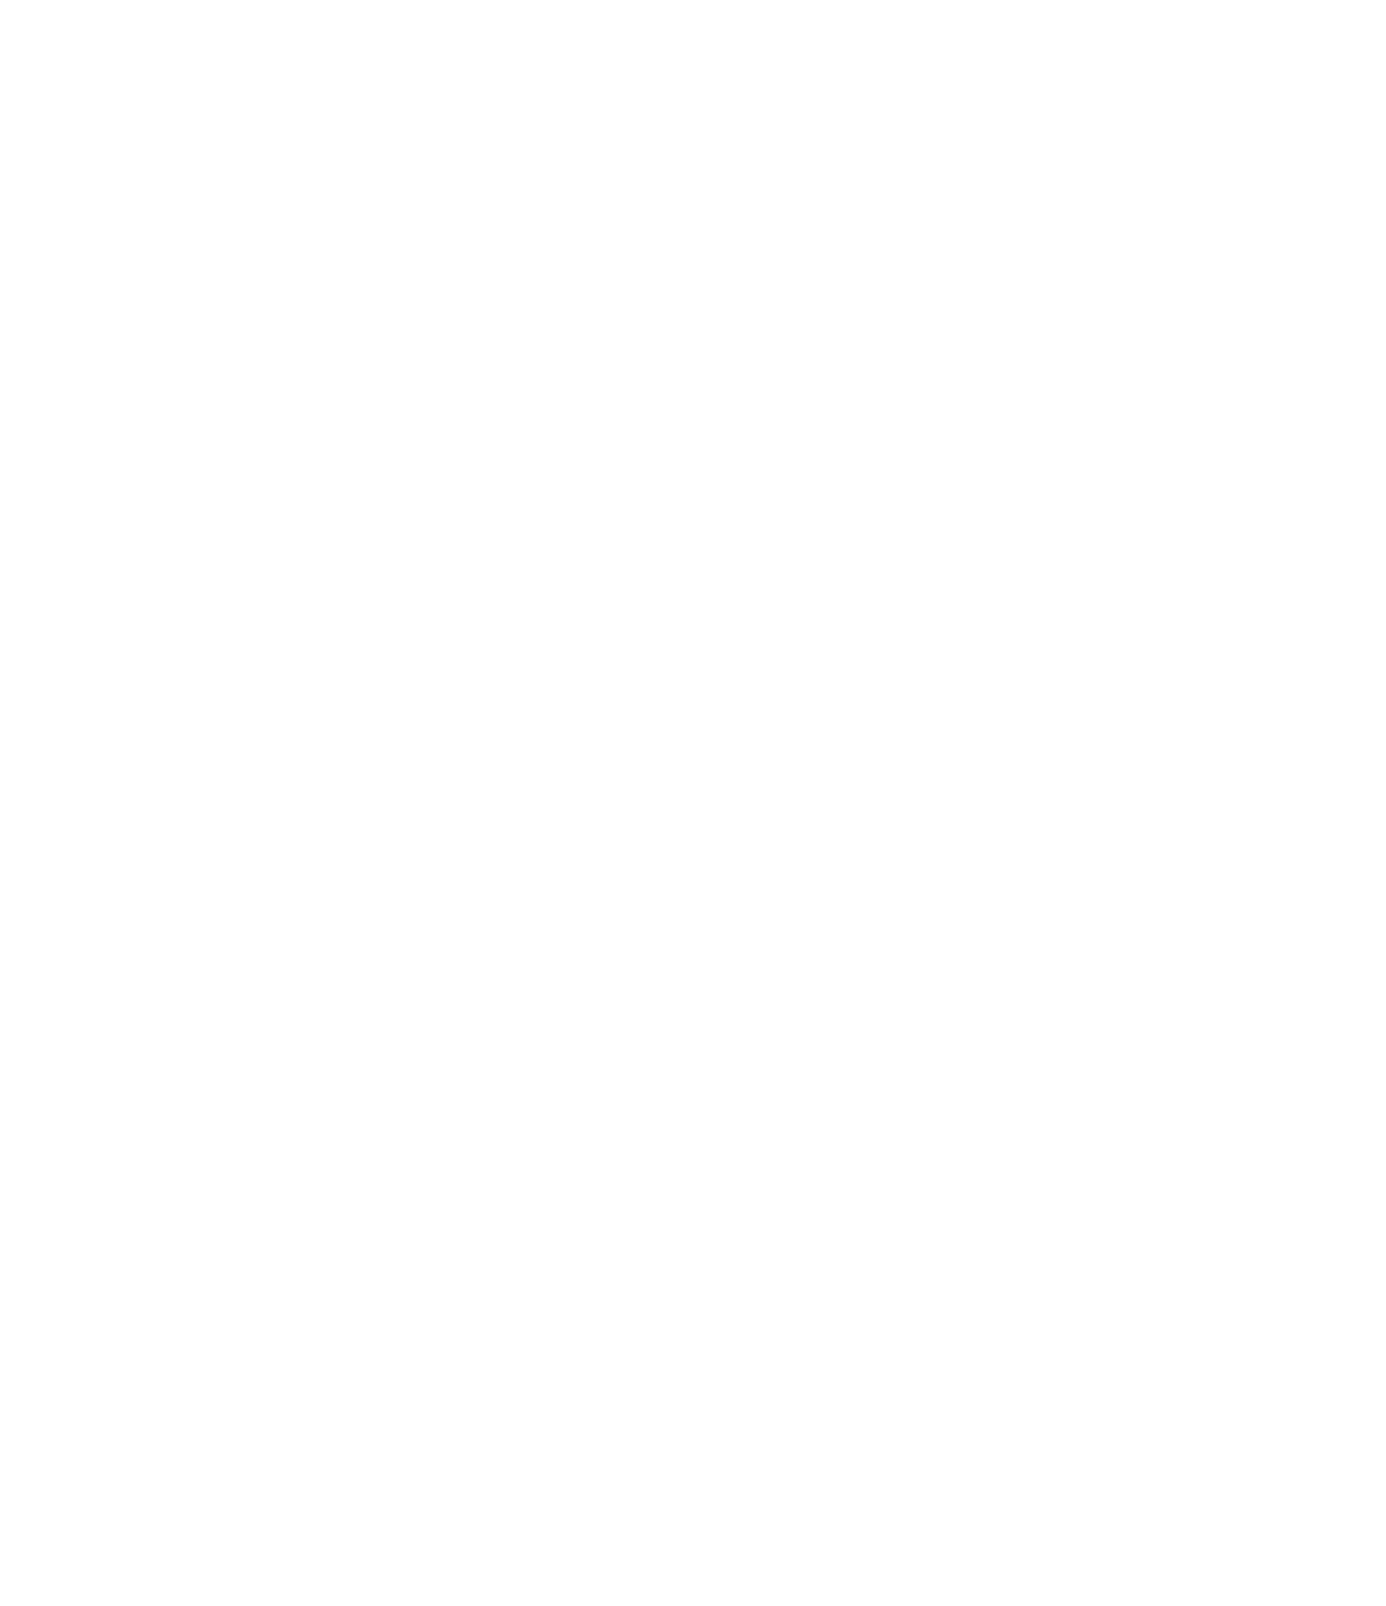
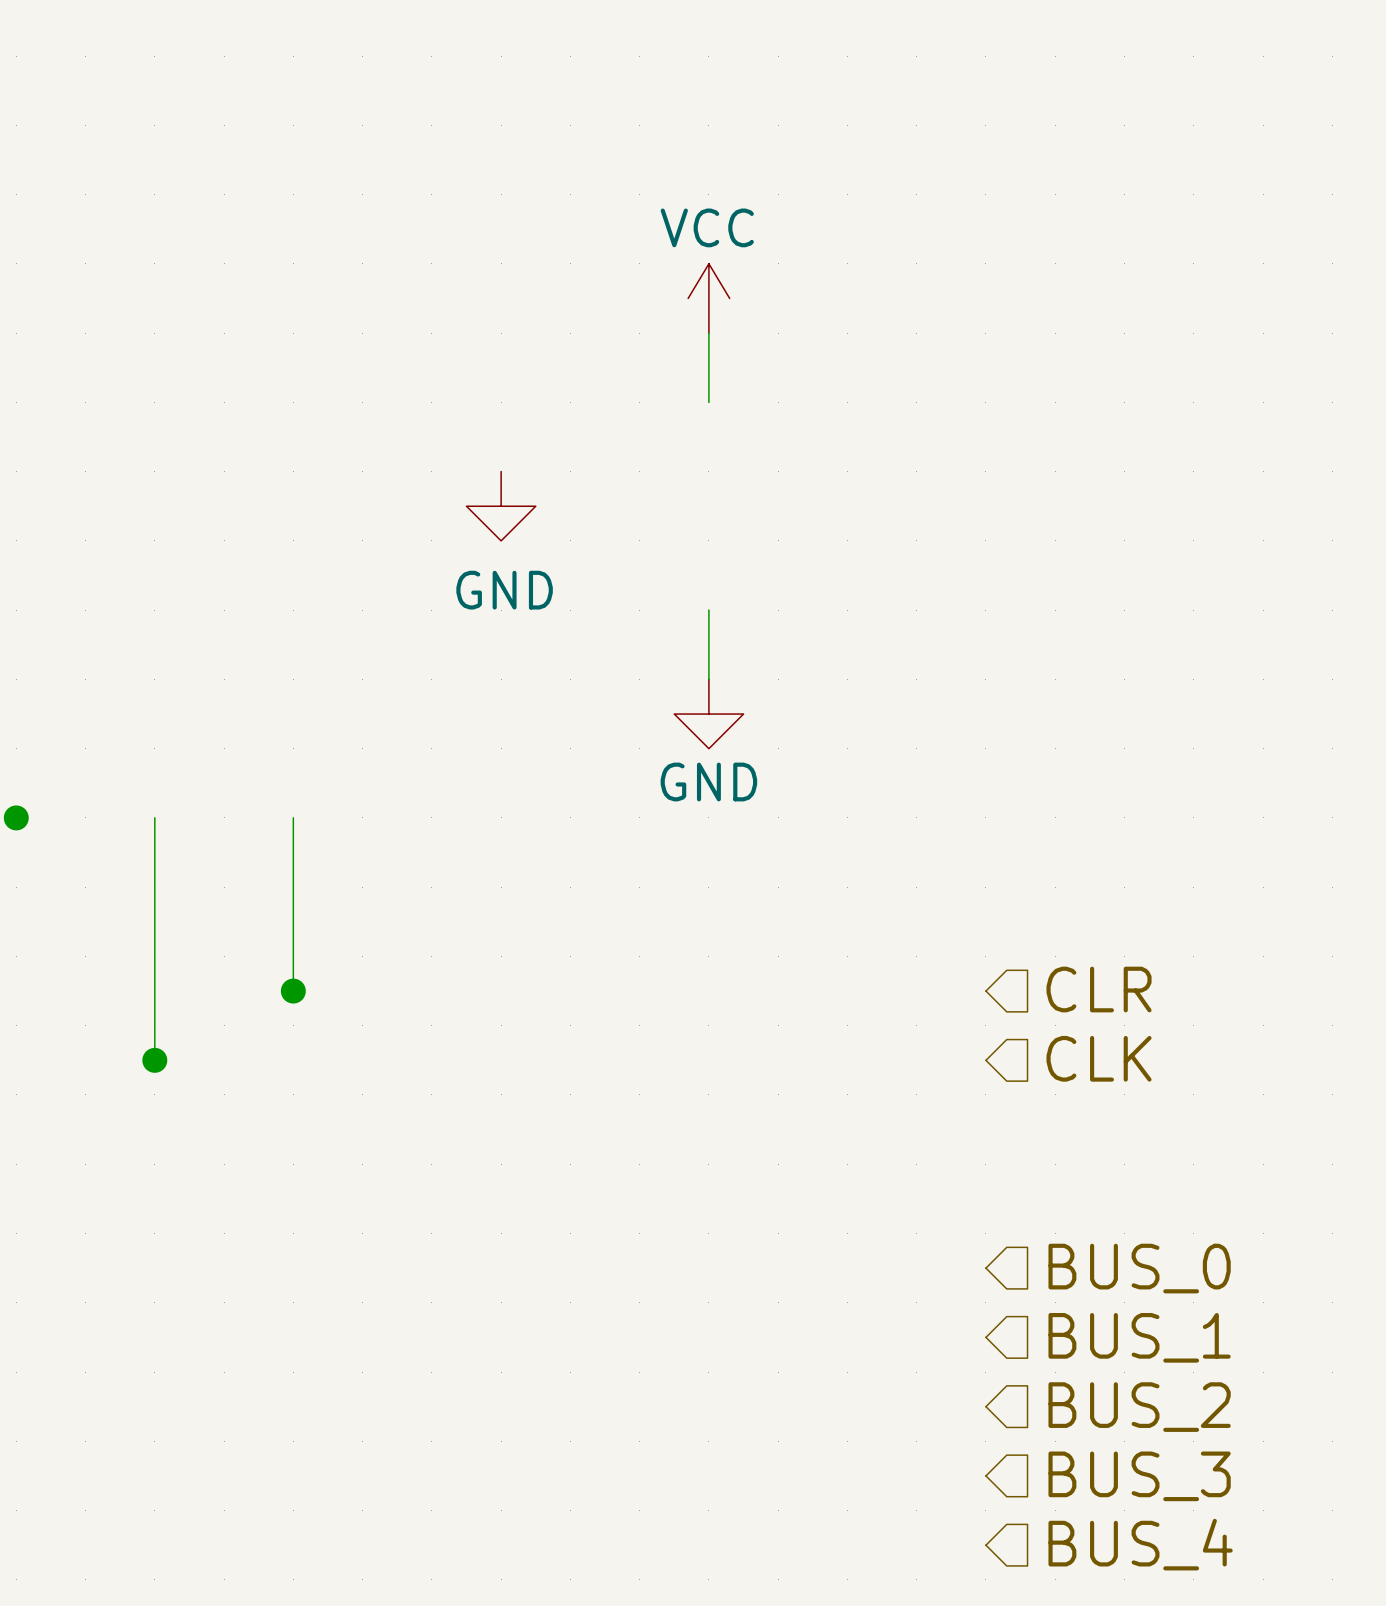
power symbol: none -> VCC (708, 298)
wire: none -> (708, 333) (708, 402)
power symbol: none -> GND (501, 506)
wire: none -> (708, 610) (708, 679)
power symbol: none -> GND (708, 714)
junction: none -> (16, 817)
wire: none -> (154, 817) (154, 1060)
wire: none -> (293, 817) (293, 991)
hierarchical label: none -> CLR (1099, 989)
junction: none -> (293, 991)
hierarchical label: none -> CLK (1099, 1058)
junction: none -> (154, 1060)
hierarchical label: none -> BUS_0 (1139, 1268)
hierarchical label: none -> BUS_1 (1139, 1337)
hierarchical label: none -> BUS_2 (1139, 1407)
hierarchical label: none -> BUS_3 (1139, 1476)
hierarchical label: none -> BUS_4 (1140, 1544)

